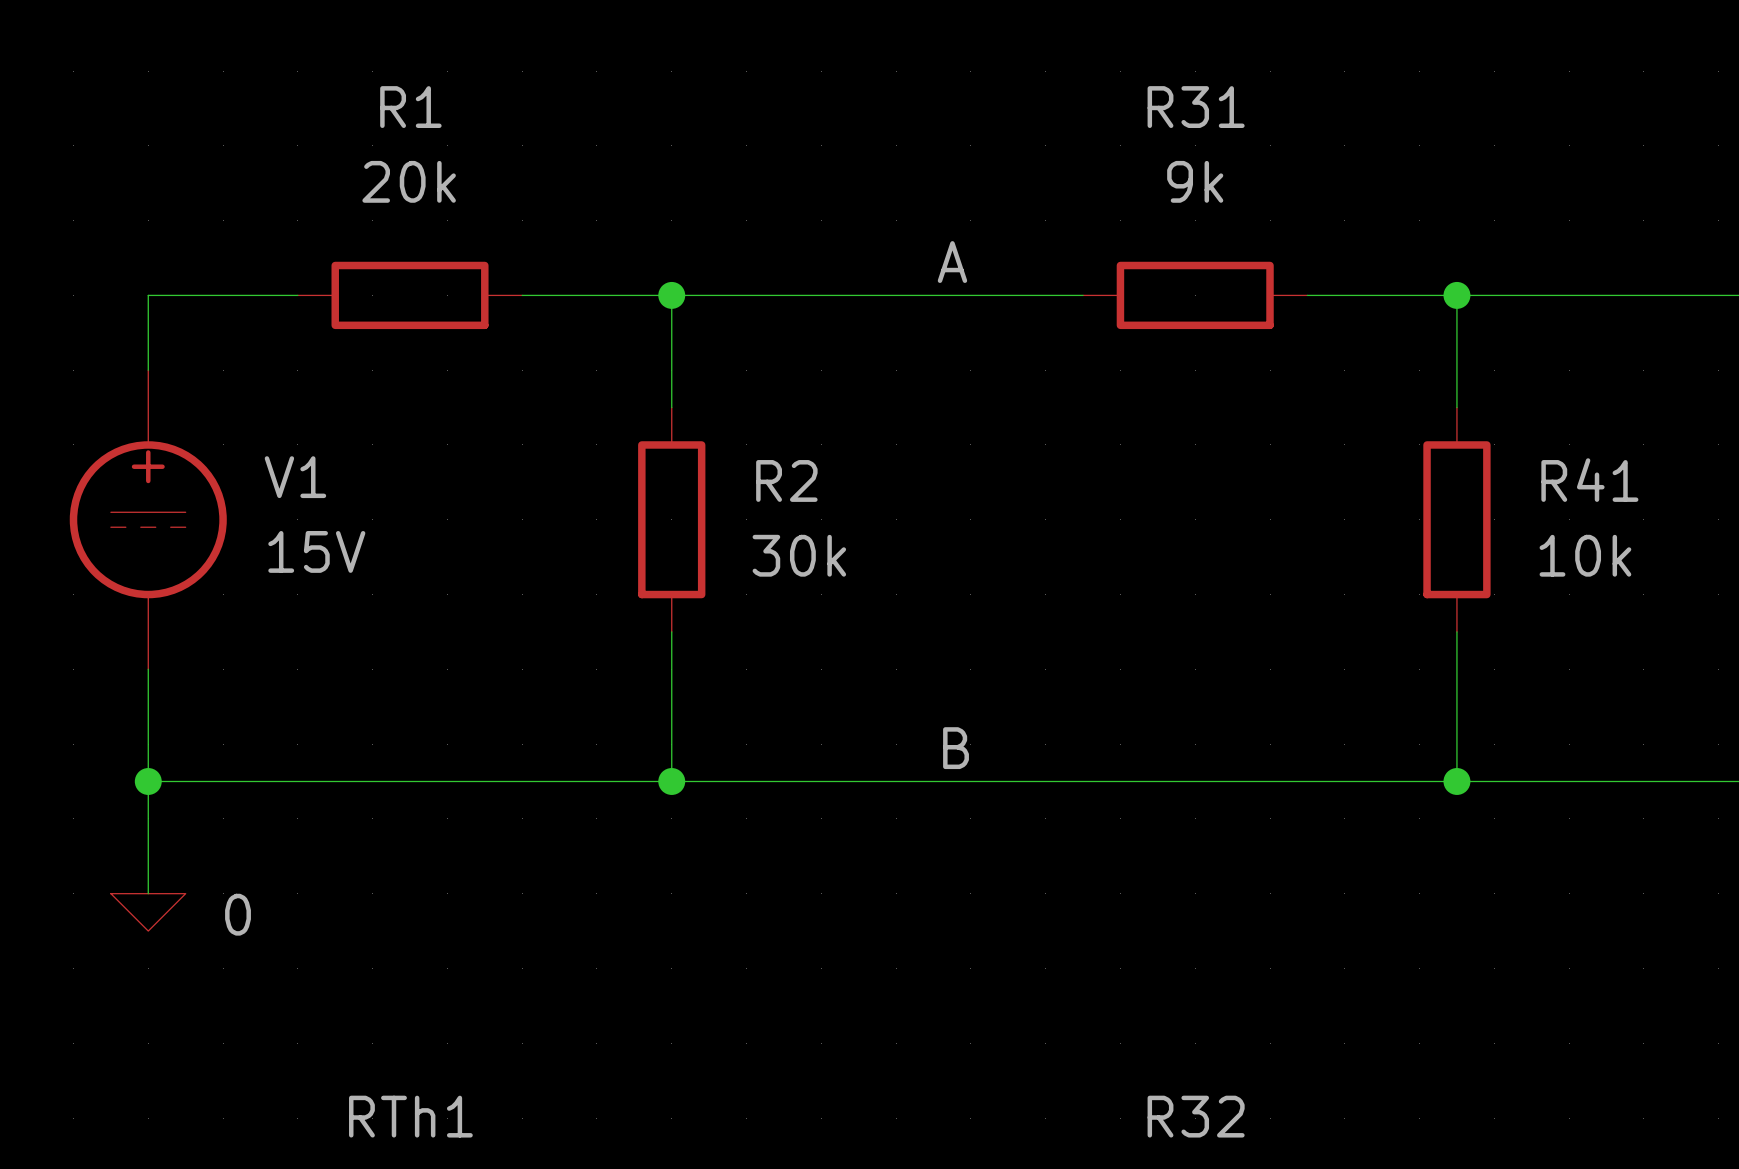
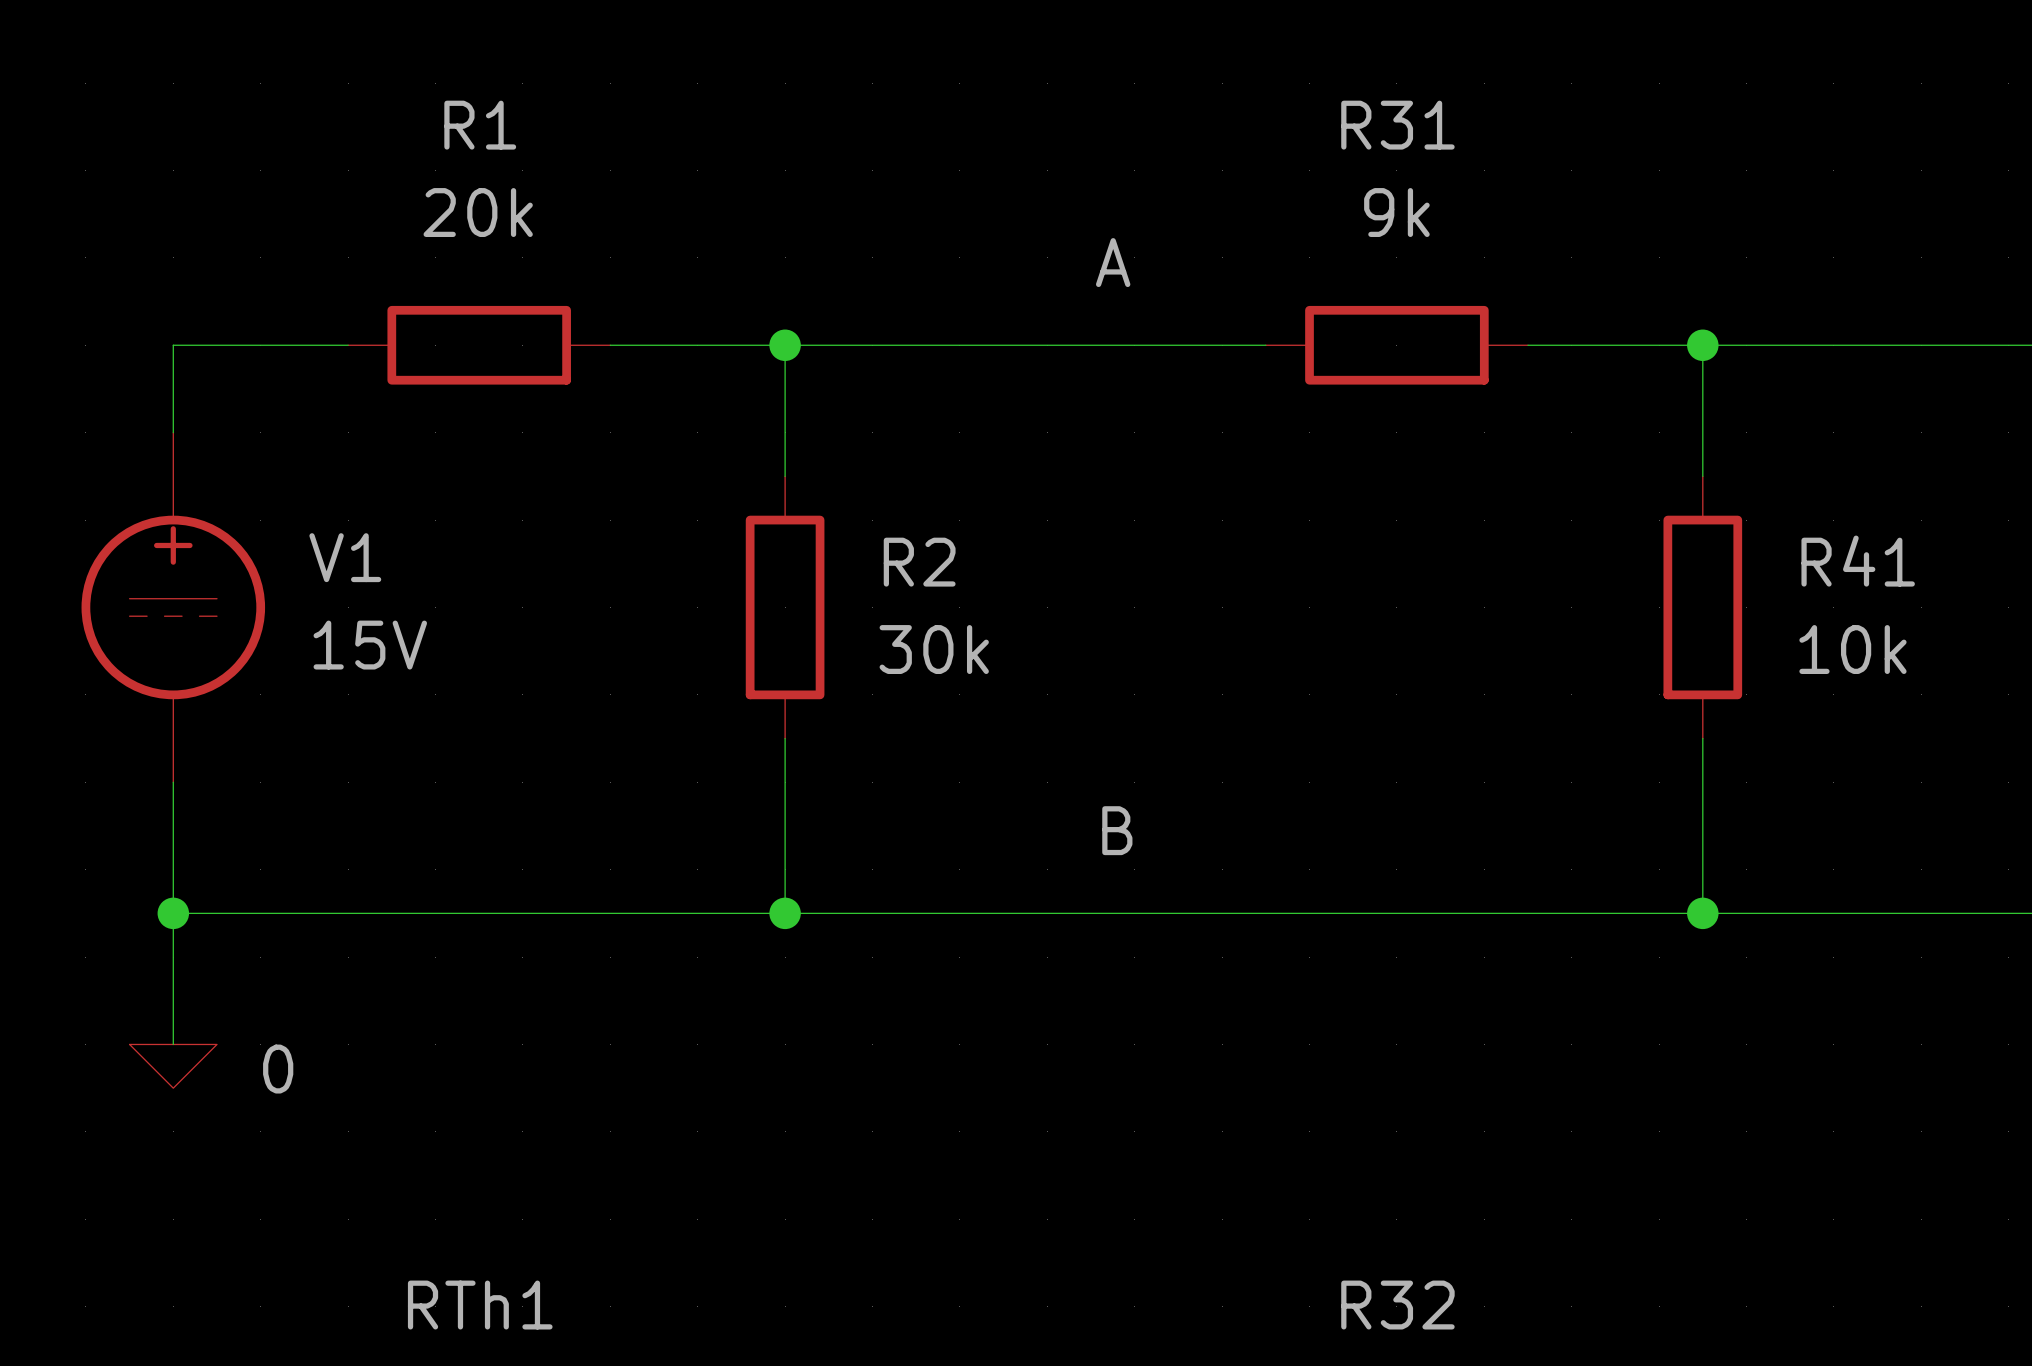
label position: A (952, 262) -> A (1113, 262)
label position: B (956, 748) -> B (1117, 830)

